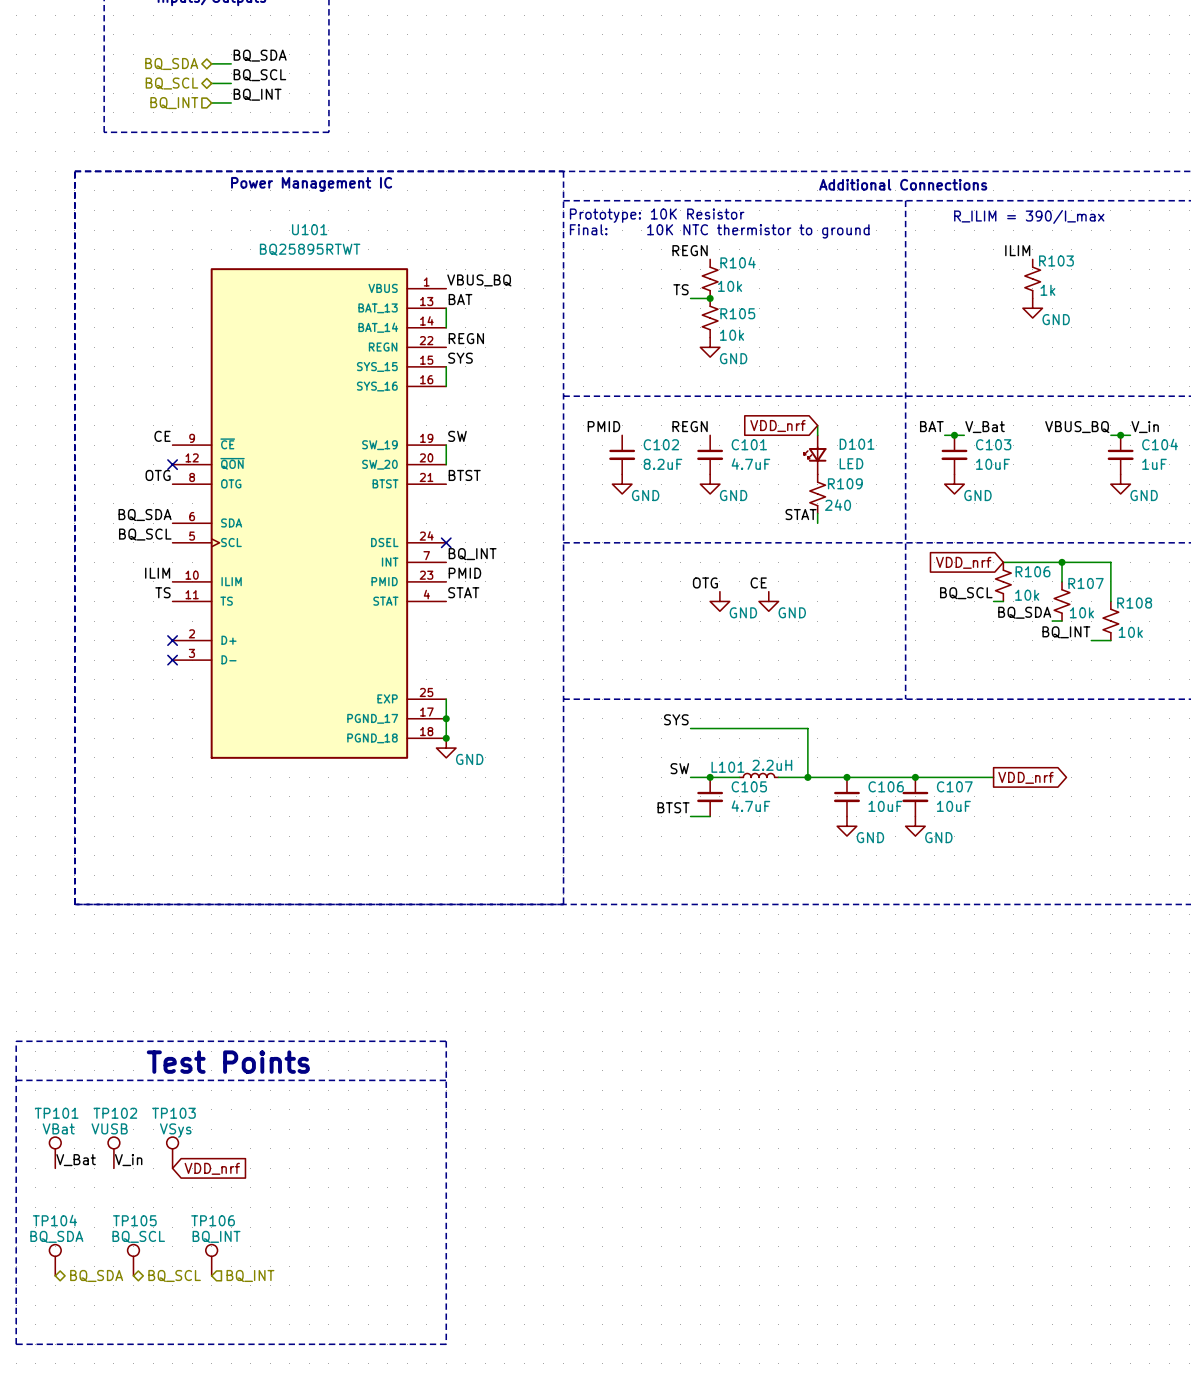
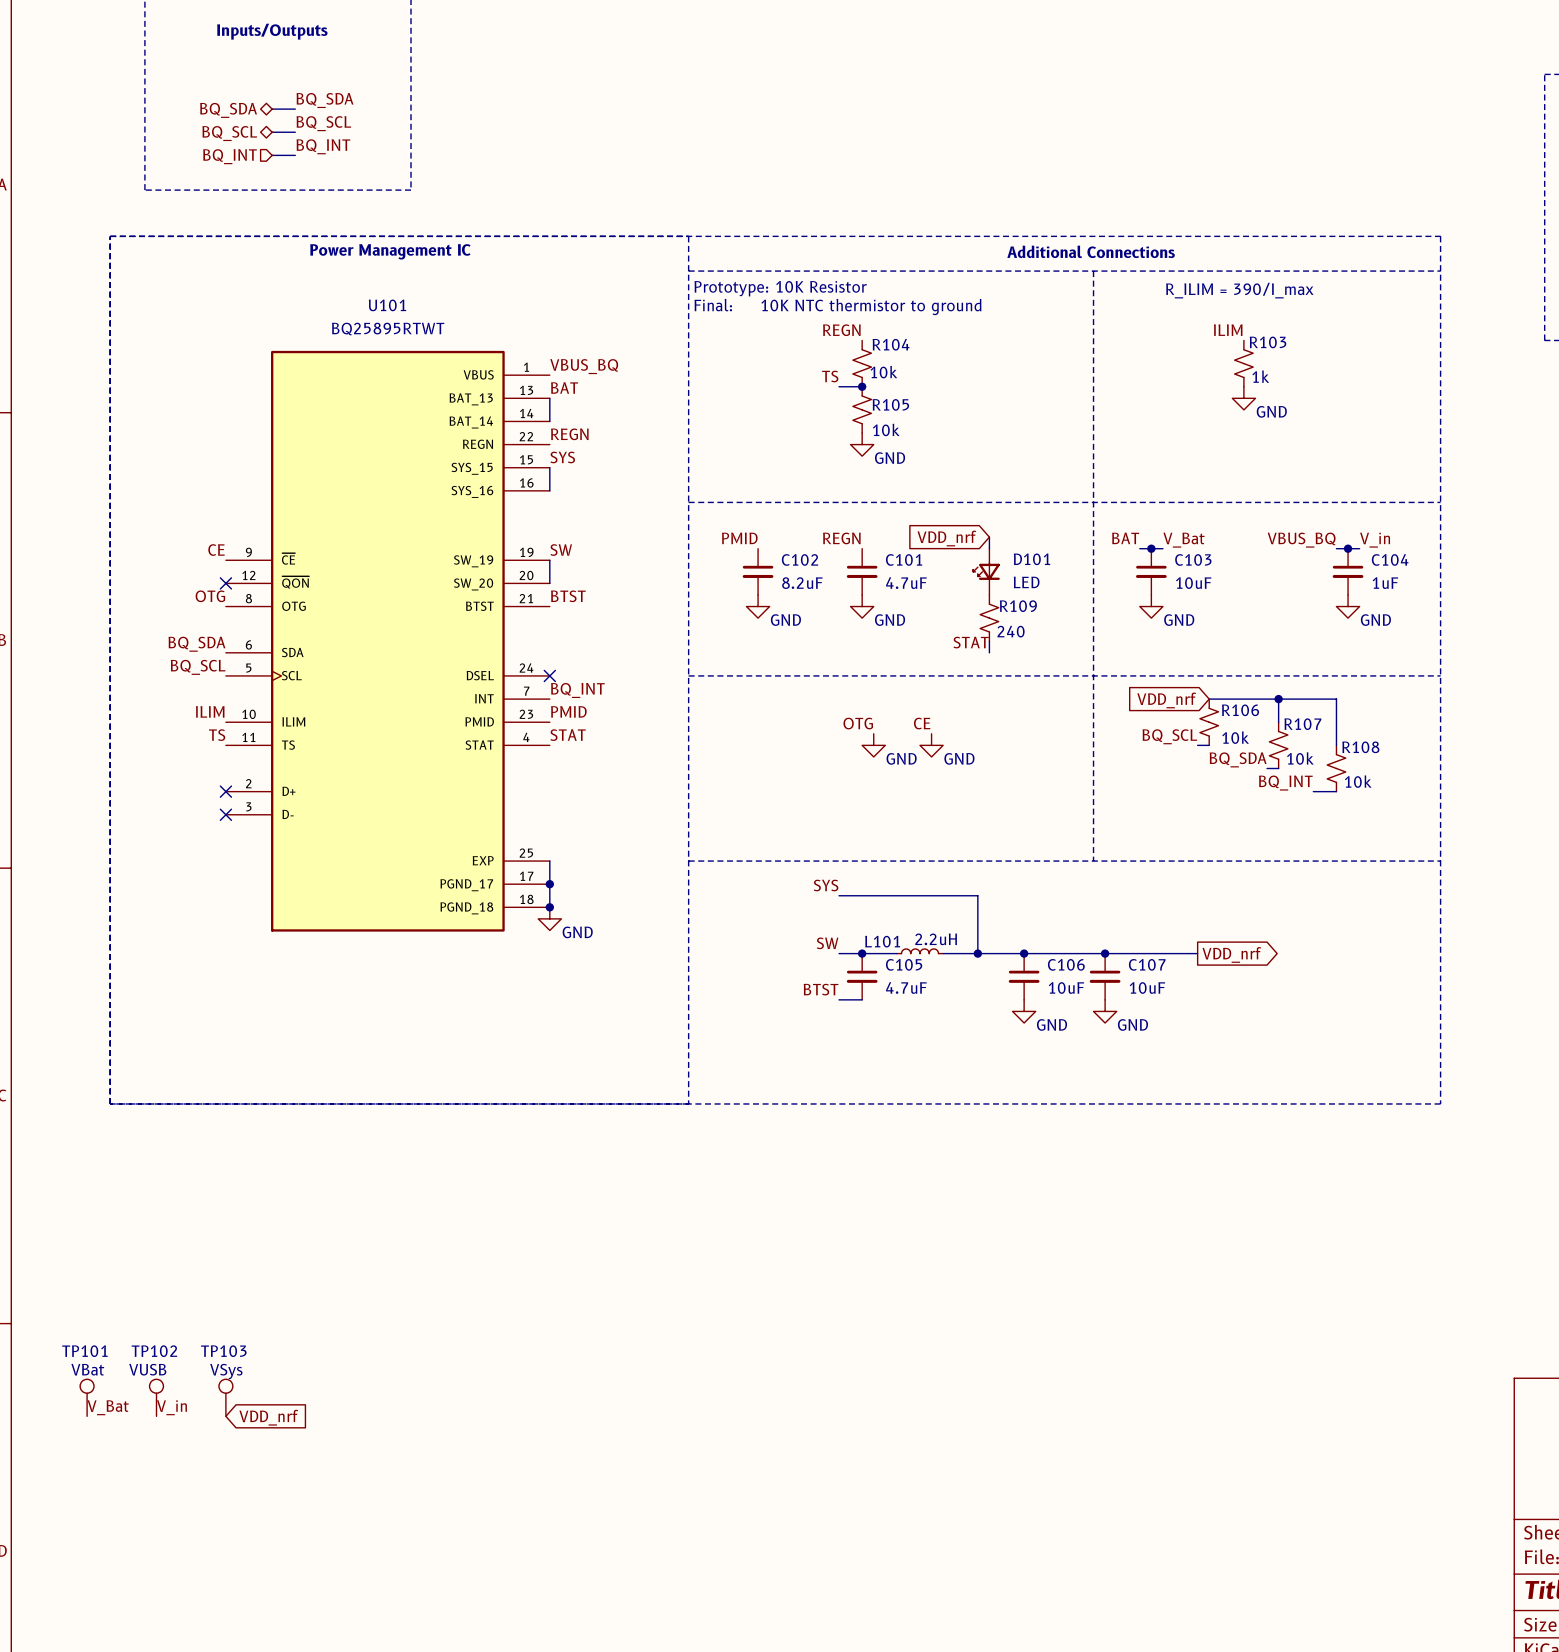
line: (16, 1041) (446, 1041) (446, 1344) (16, 1344) (16, 1041) -> none
text: Test Points (228, 1062) -> none
line: (16, 1080) (446, 1080) -> none
TP104: BQ_SDA (55, 1260) -> none
TP105: BQ_SCL (133, 1260) -> none
TP106: BQ_INT (211, 1260) -> none
hierarchical label: BQ_SDA (96, 1275) -> none
hierarchical label: BQ_SCL (174, 1275) -> none
hierarchical label: BQ_INT (250, 1275) -> none

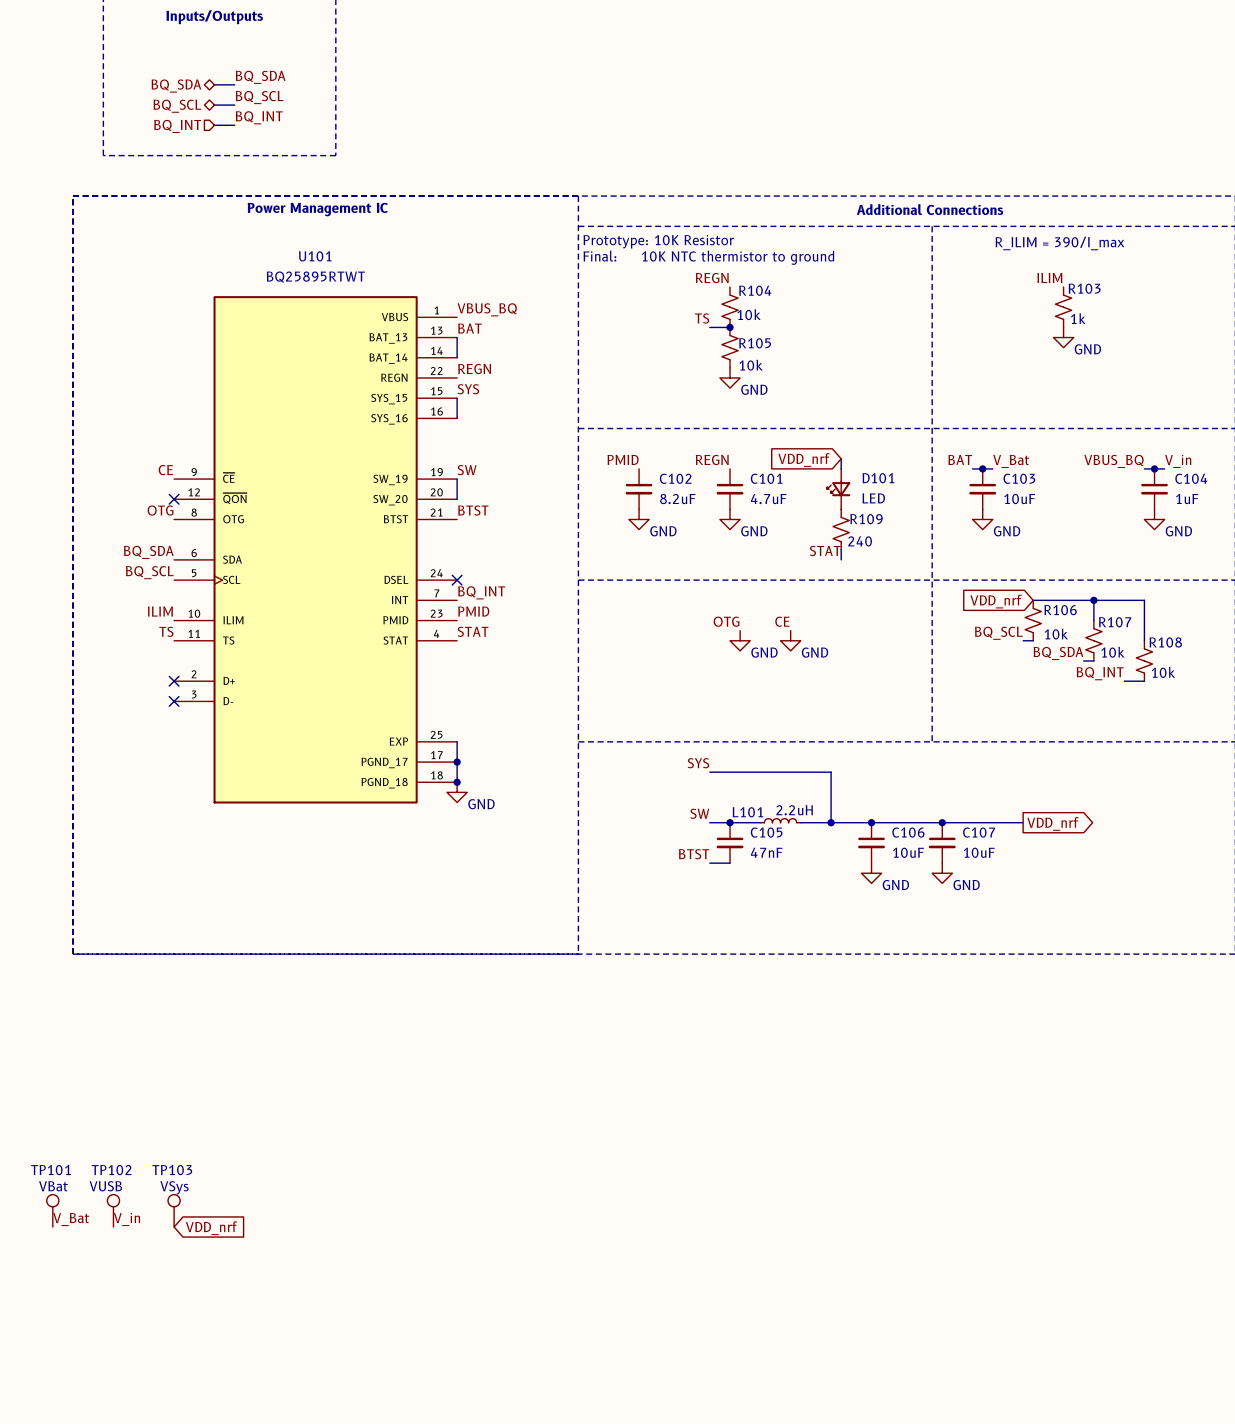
C105 value: 4.7uF (906, 987) -> 47nF (766, 852)

